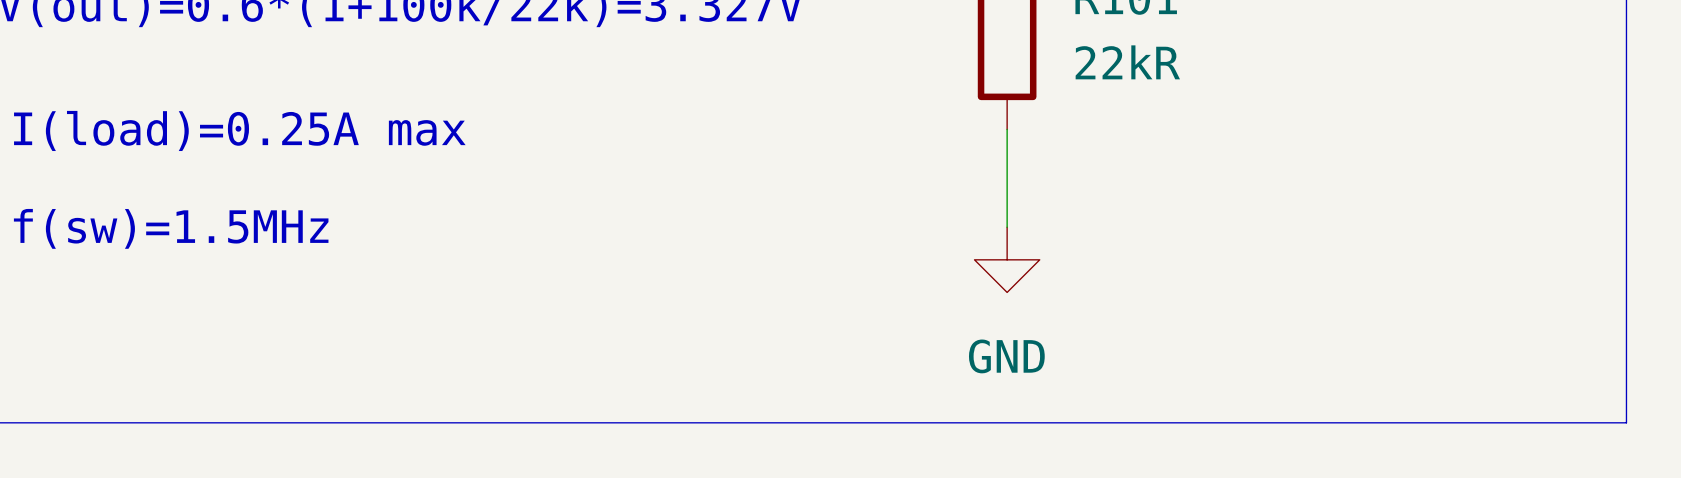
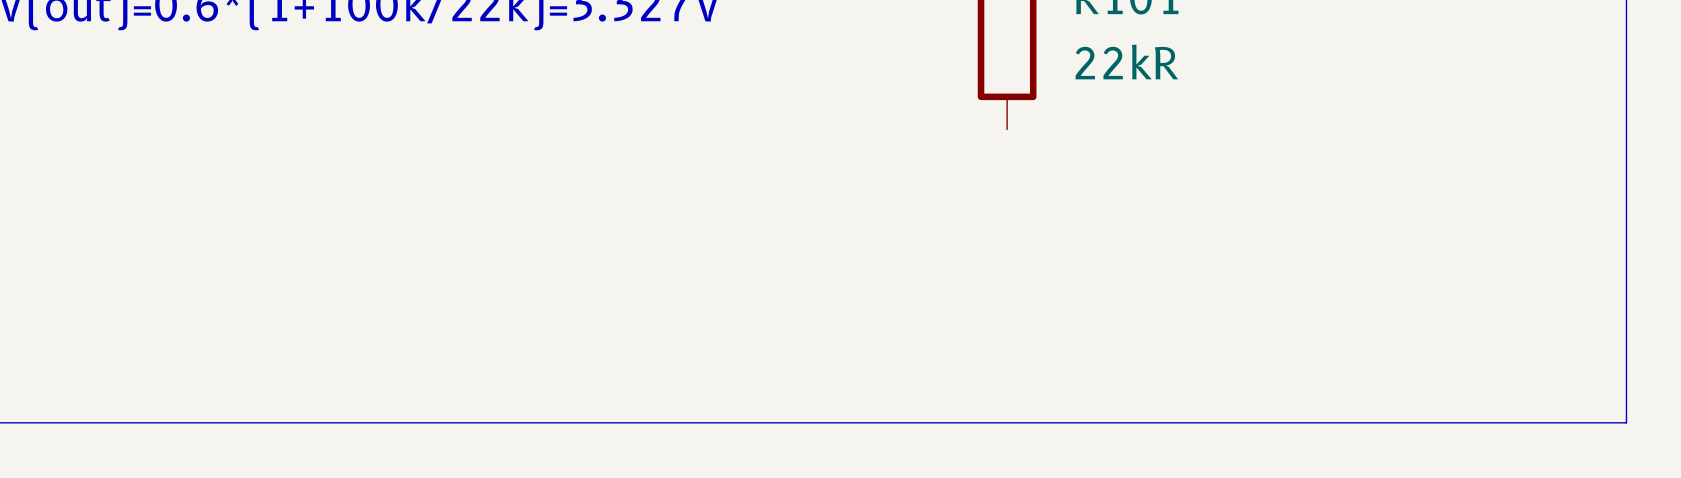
wire: (1007, 129) (1007, 227) -> none
text: I(load)=0.25A max (239, 130) -> none
text: f(sw)=1.5MHz (171, 228) -> none
power symbol: GND (1007, 259) -> none

